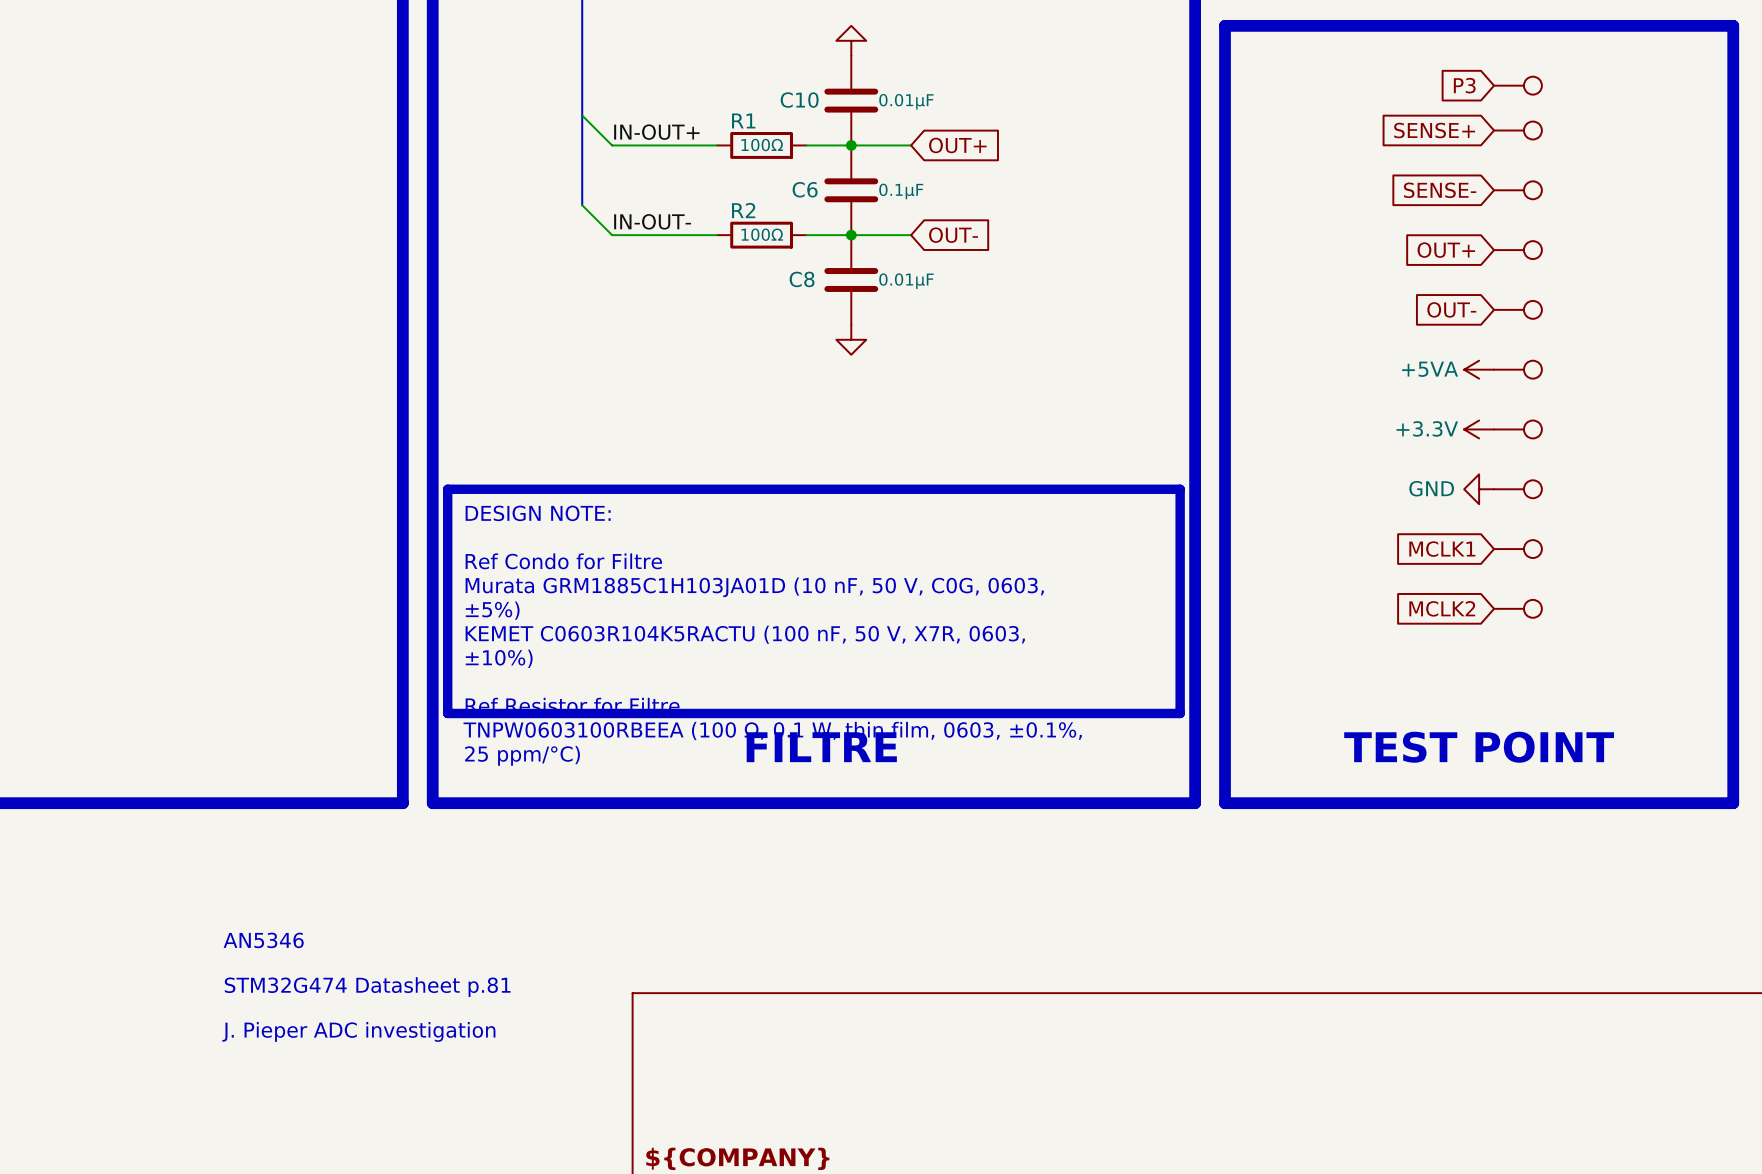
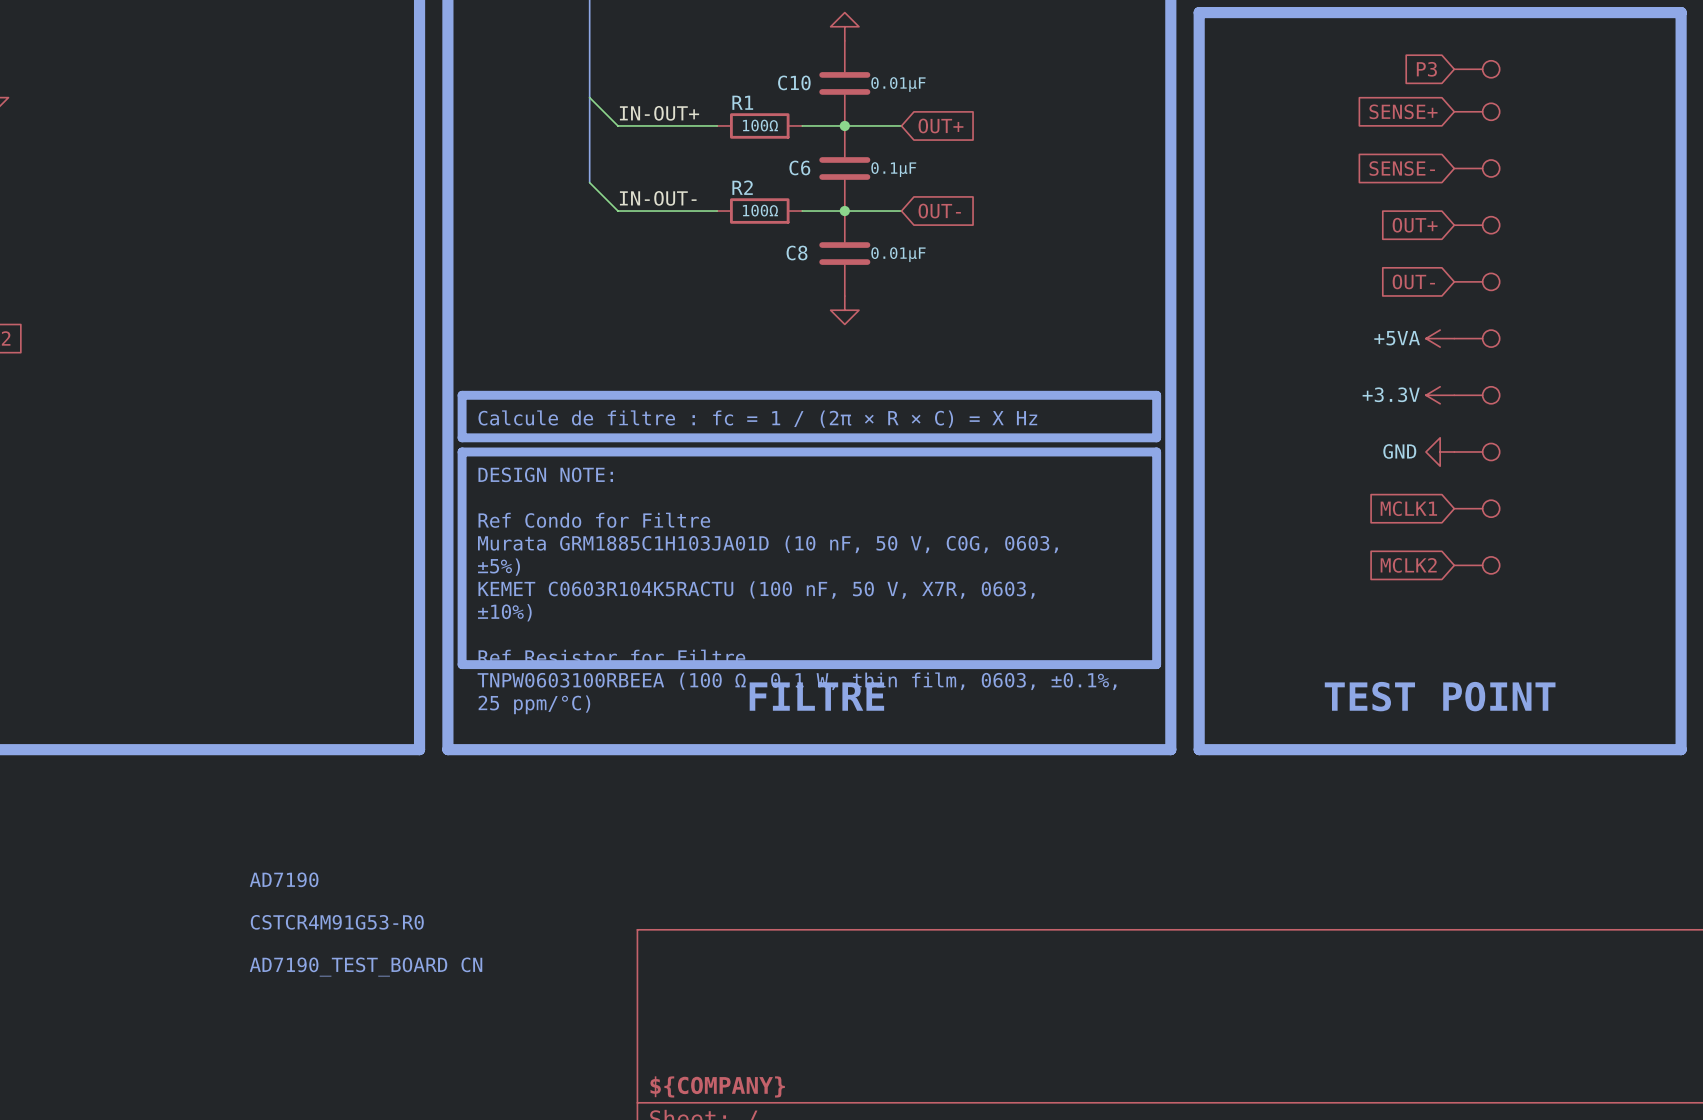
line: none -> (462, 395) (1156, 395) (1156, 437) (462, 437) (462, 395)
text: none -> Calcule de filtre : fc = 1 / (2π × R × C) = X Hz (757, 419)
text: AN5346 (263, 940) -> AD7190 (284, 879)
text: STM32G474 Datasheet p.81 (367, 987) -> CSTCR4M91G53-R0 (337, 922)
text: J. Pieper ADC investigation (358, 1031) -> AD7190_TEST_BOARD CN (366, 967)

